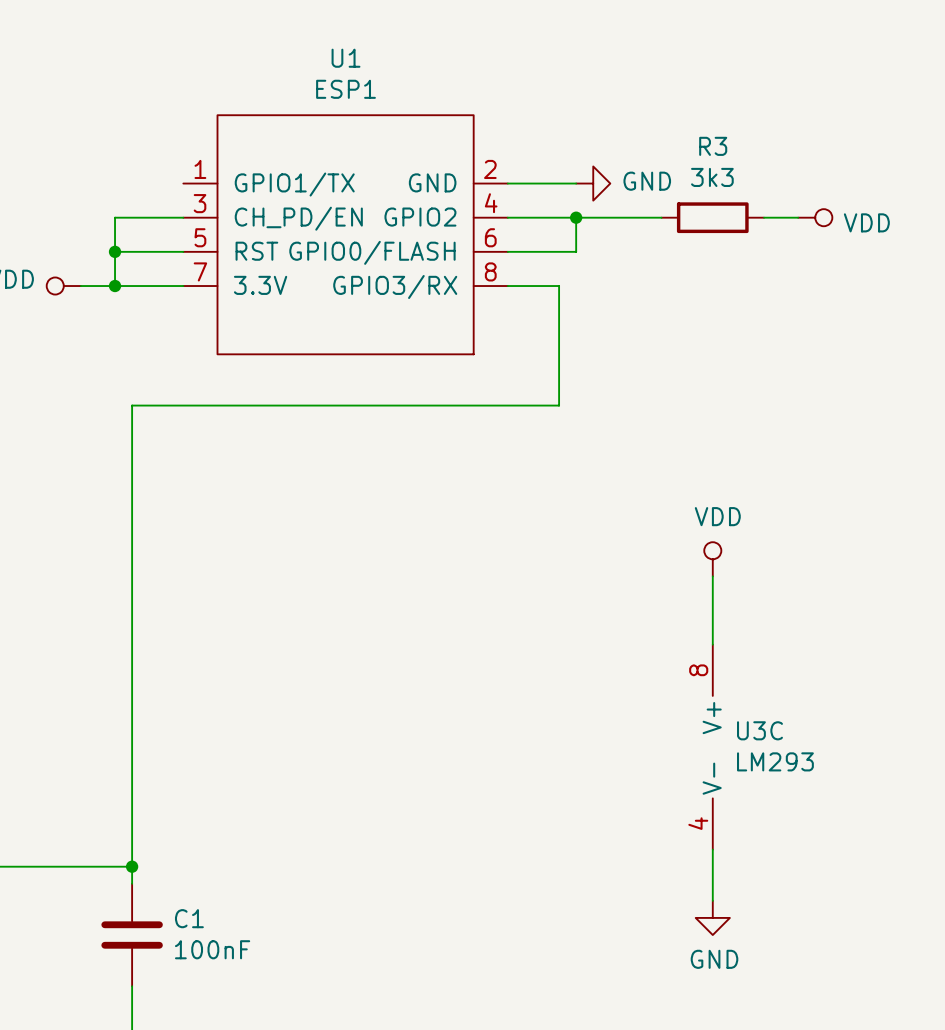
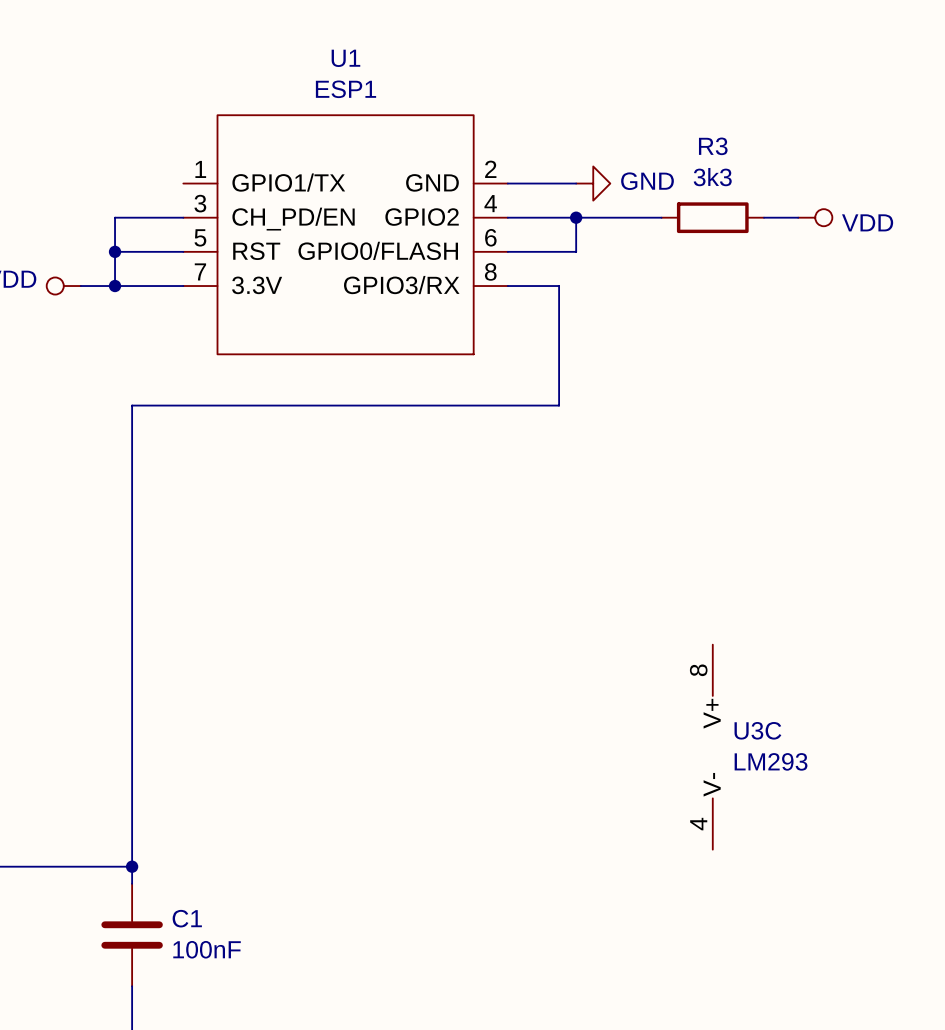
power symbol: VDD (712, 559) -> none
wire: (712, 576) (712, 644) -> none
wire: (712, 849) (712, 900) -> none
power symbol: GND (712, 917) -> none

